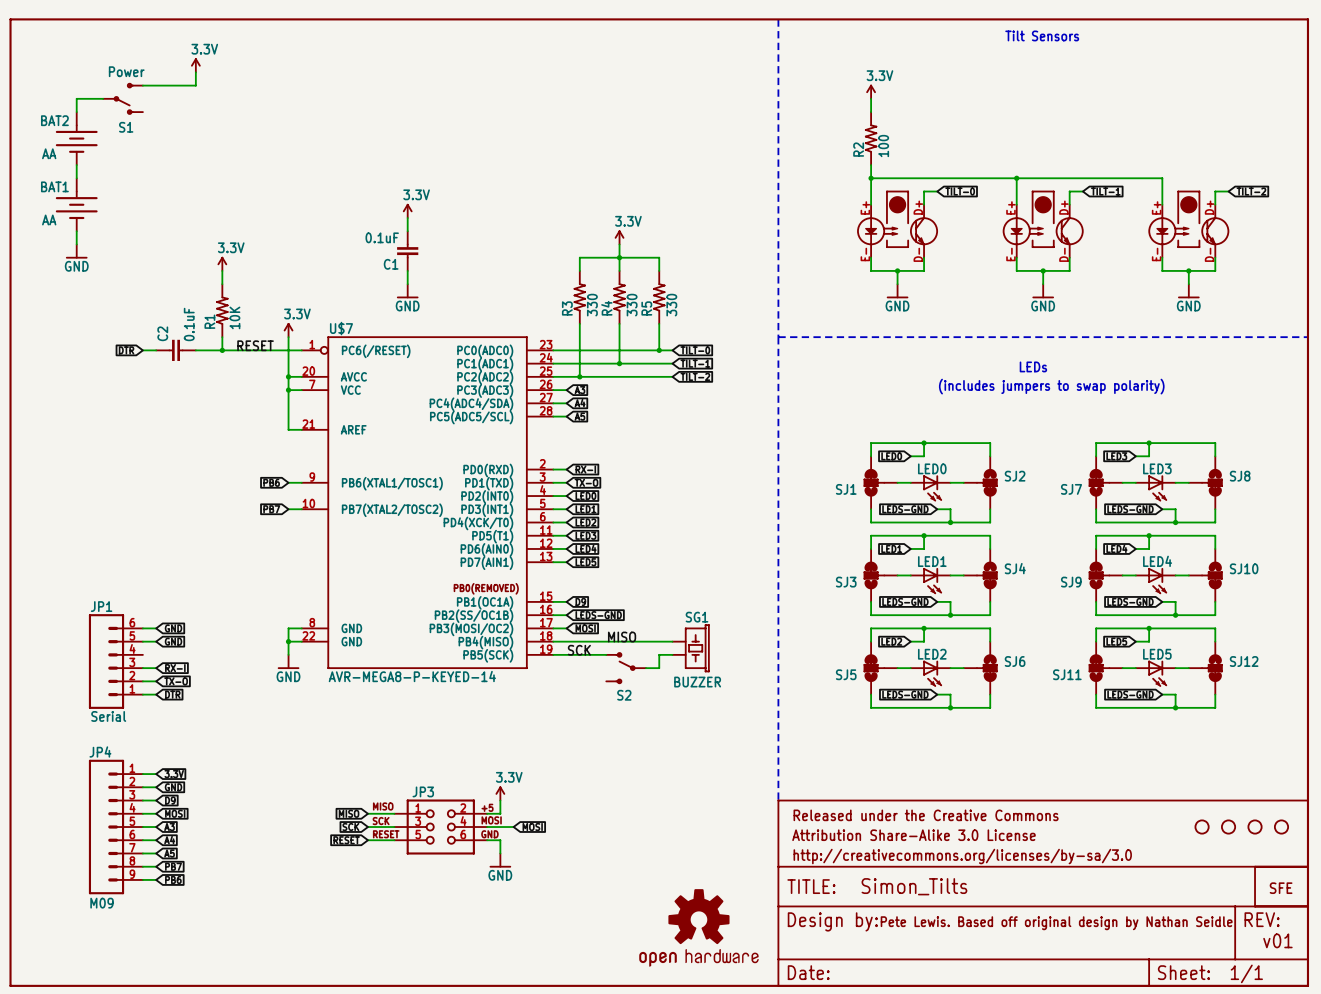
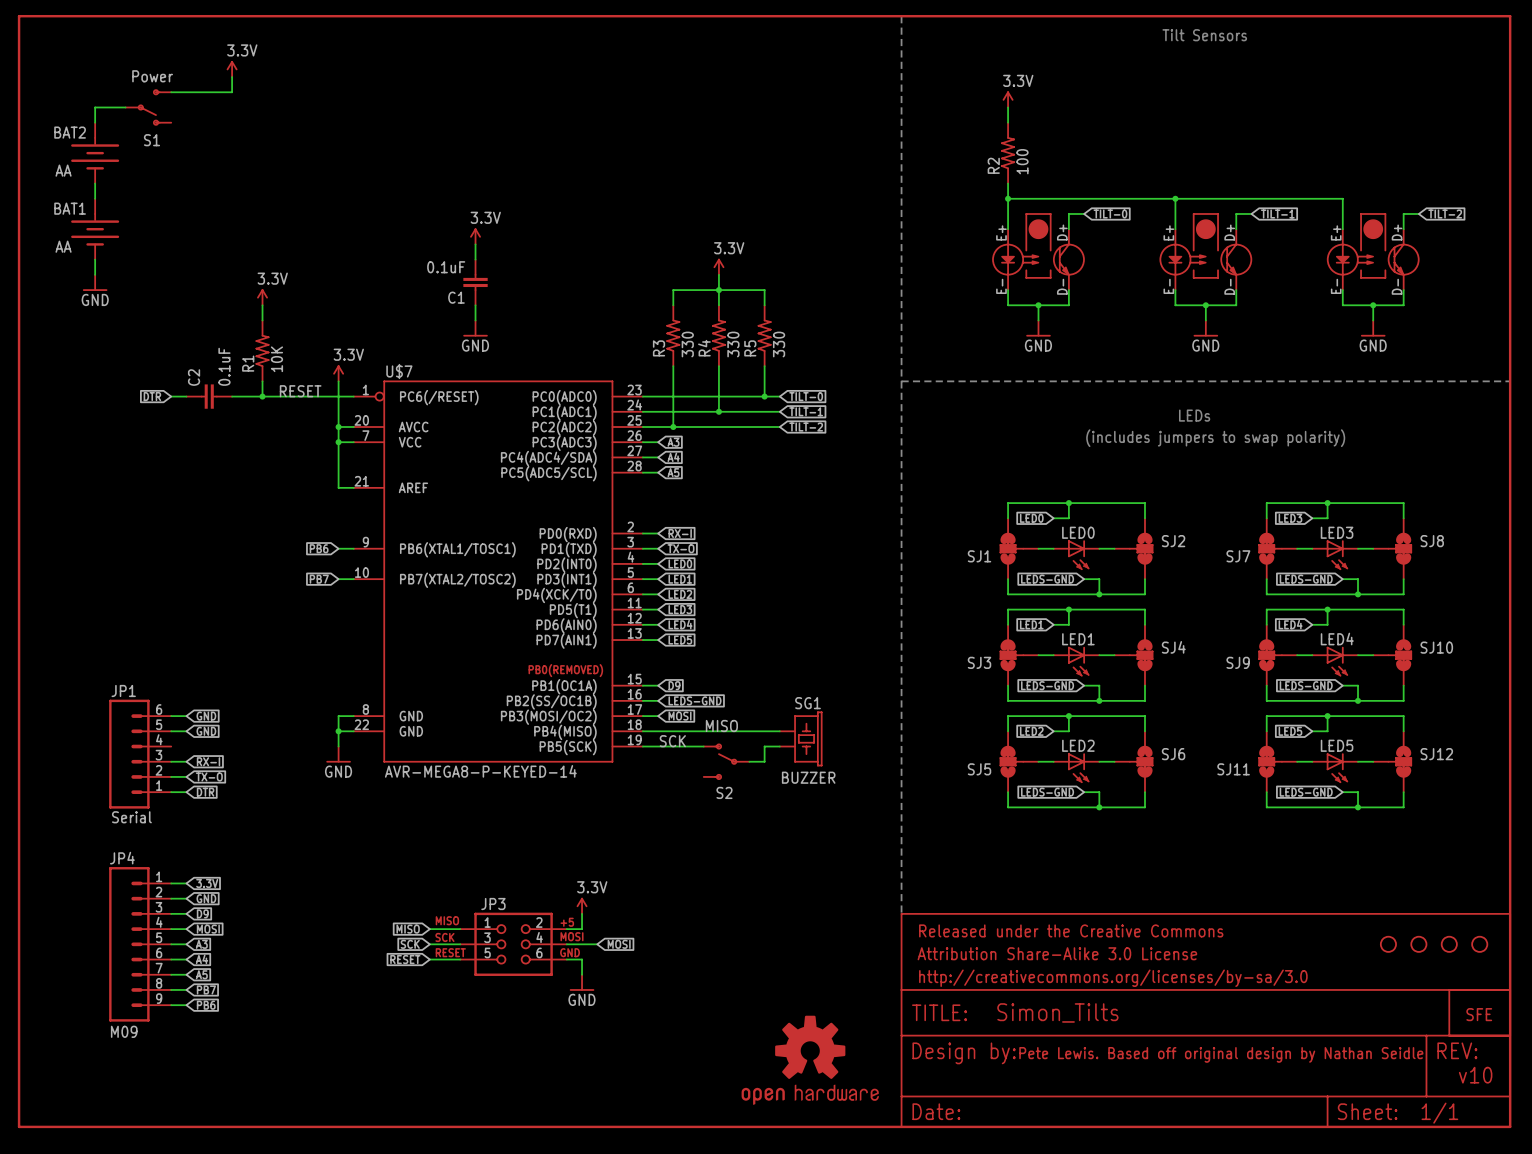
text: v01 (1277, 940) -> v10 (1475, 1075)

